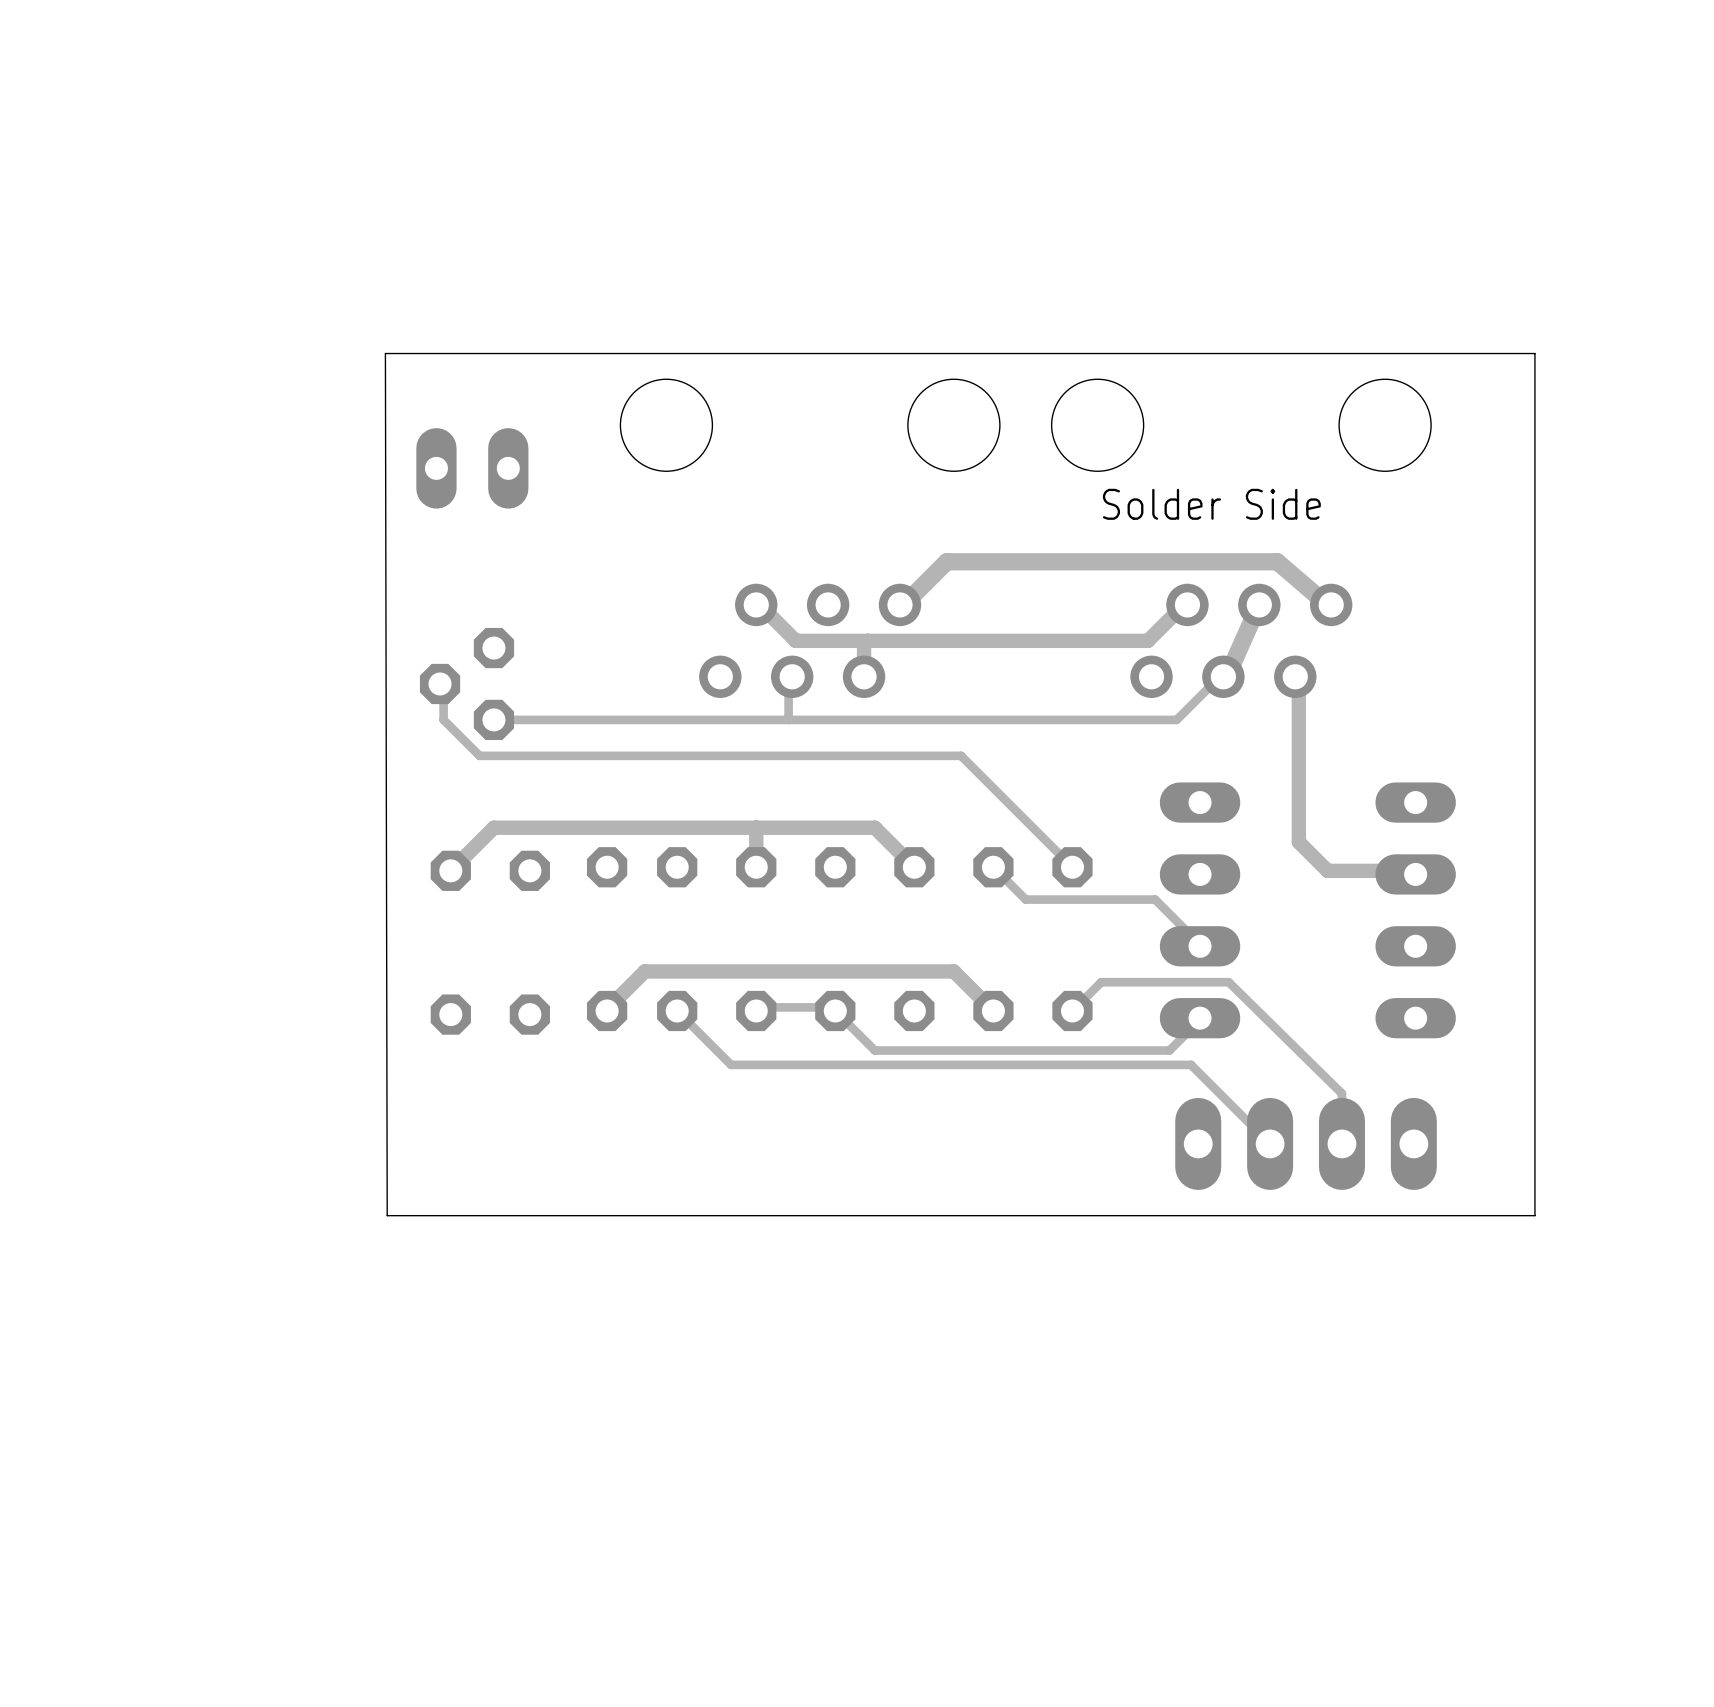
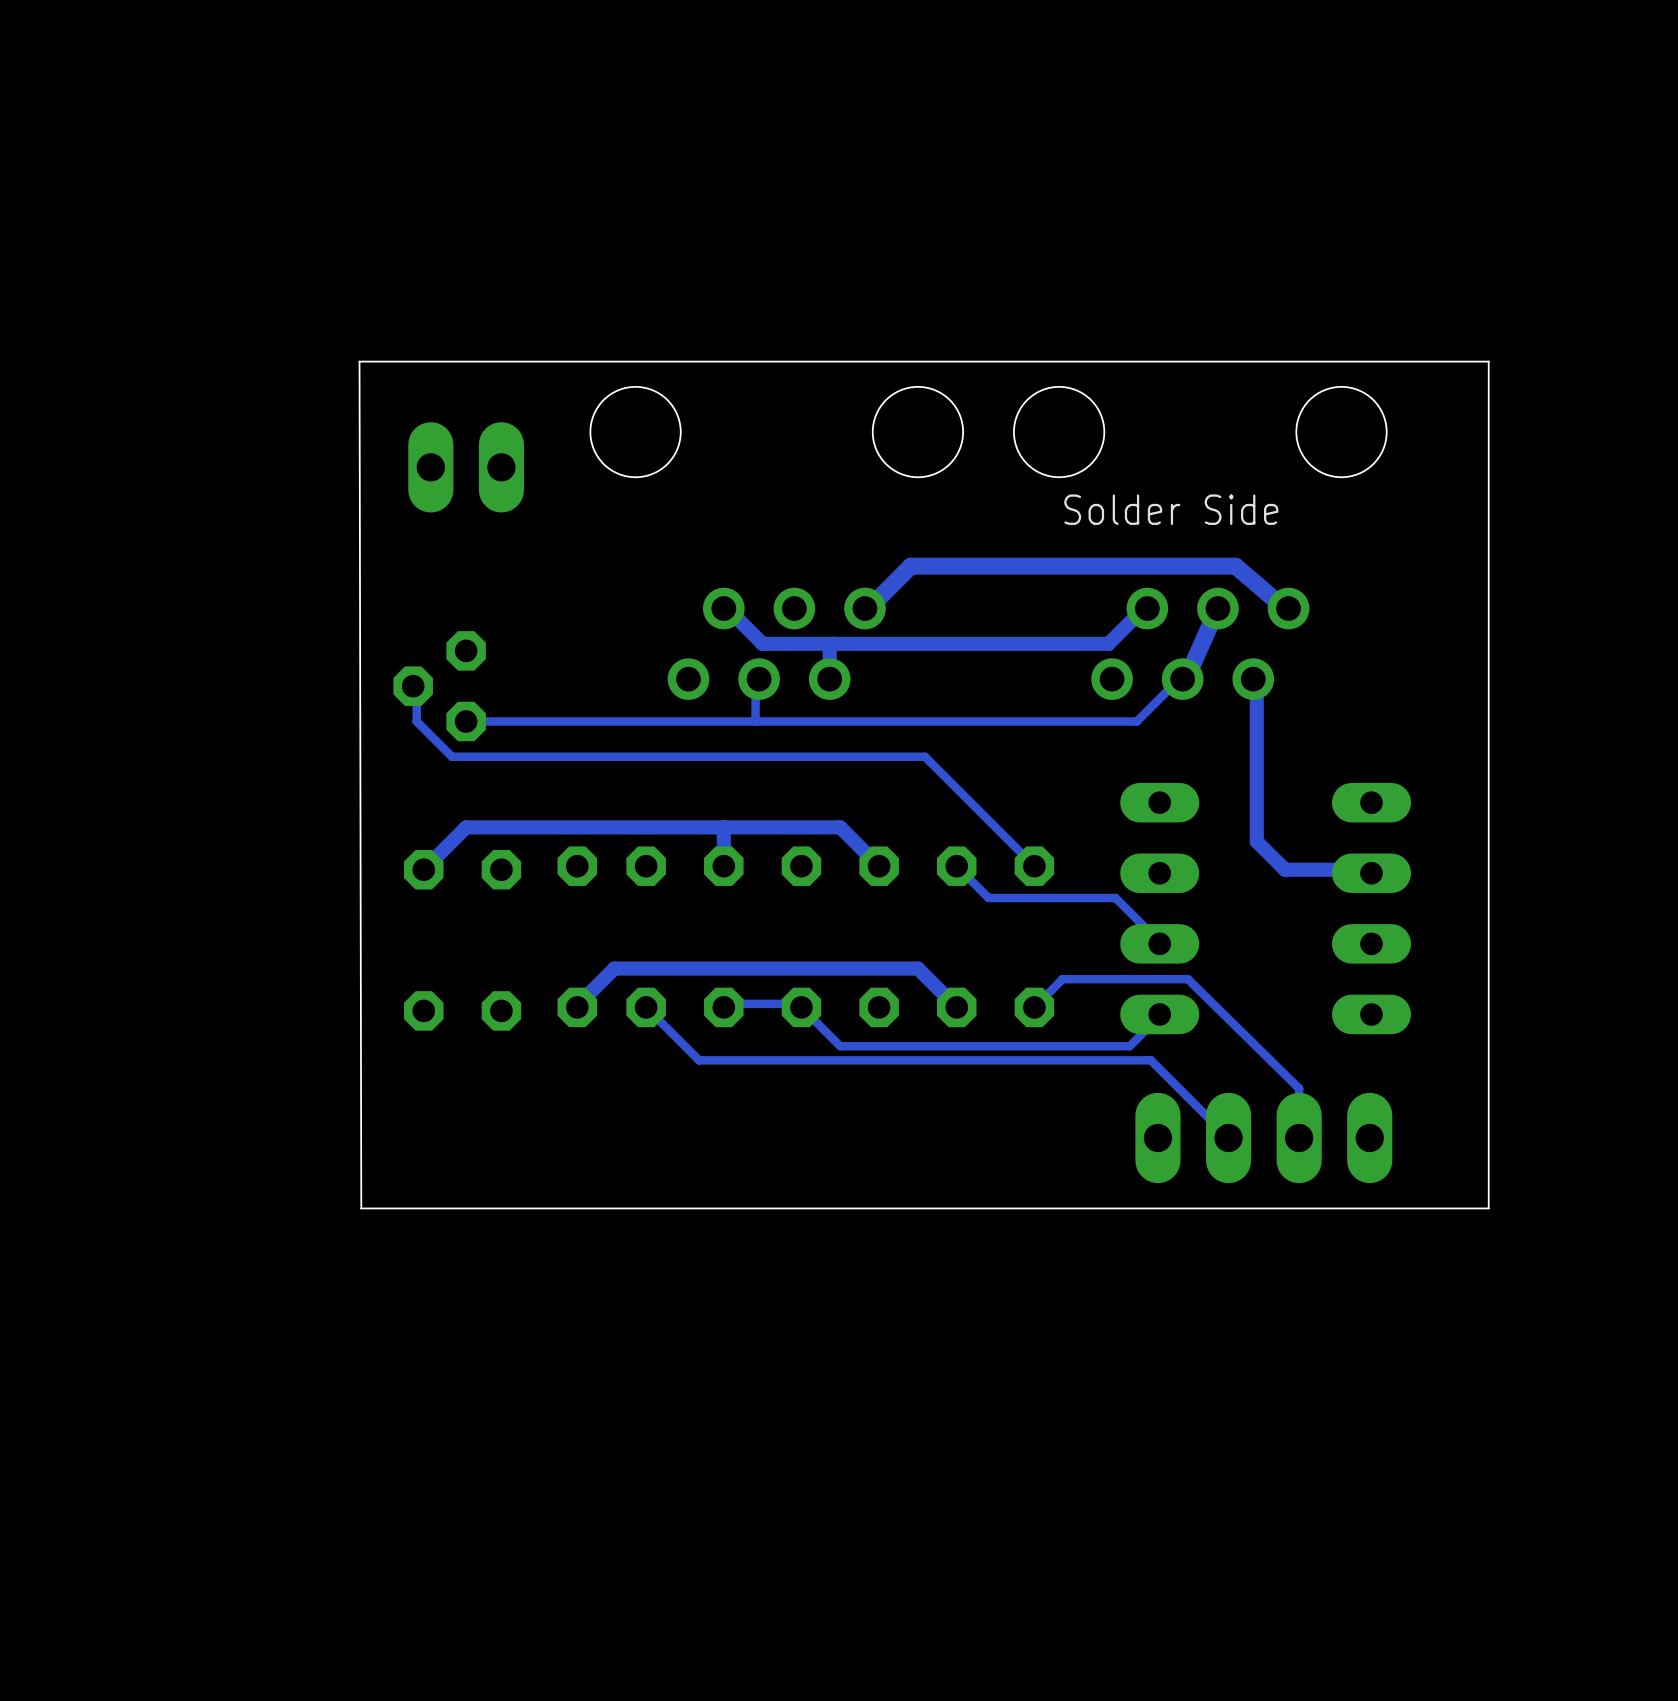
part footprint: [416, 428, 529, 509] -> [408, 422, 525, 513]

